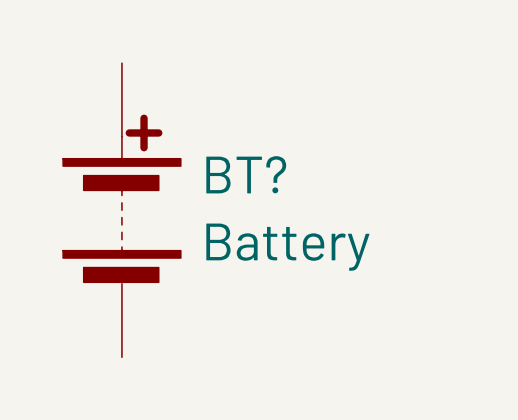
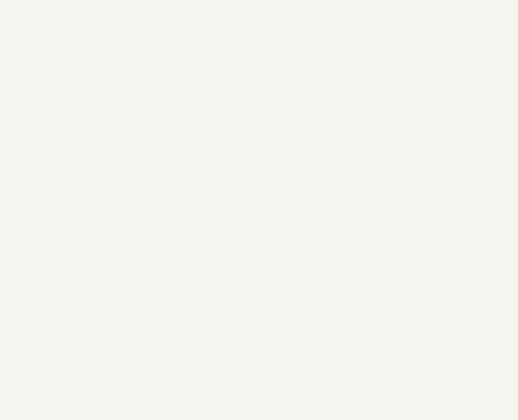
BT?: Battery (121, 210) -> none

